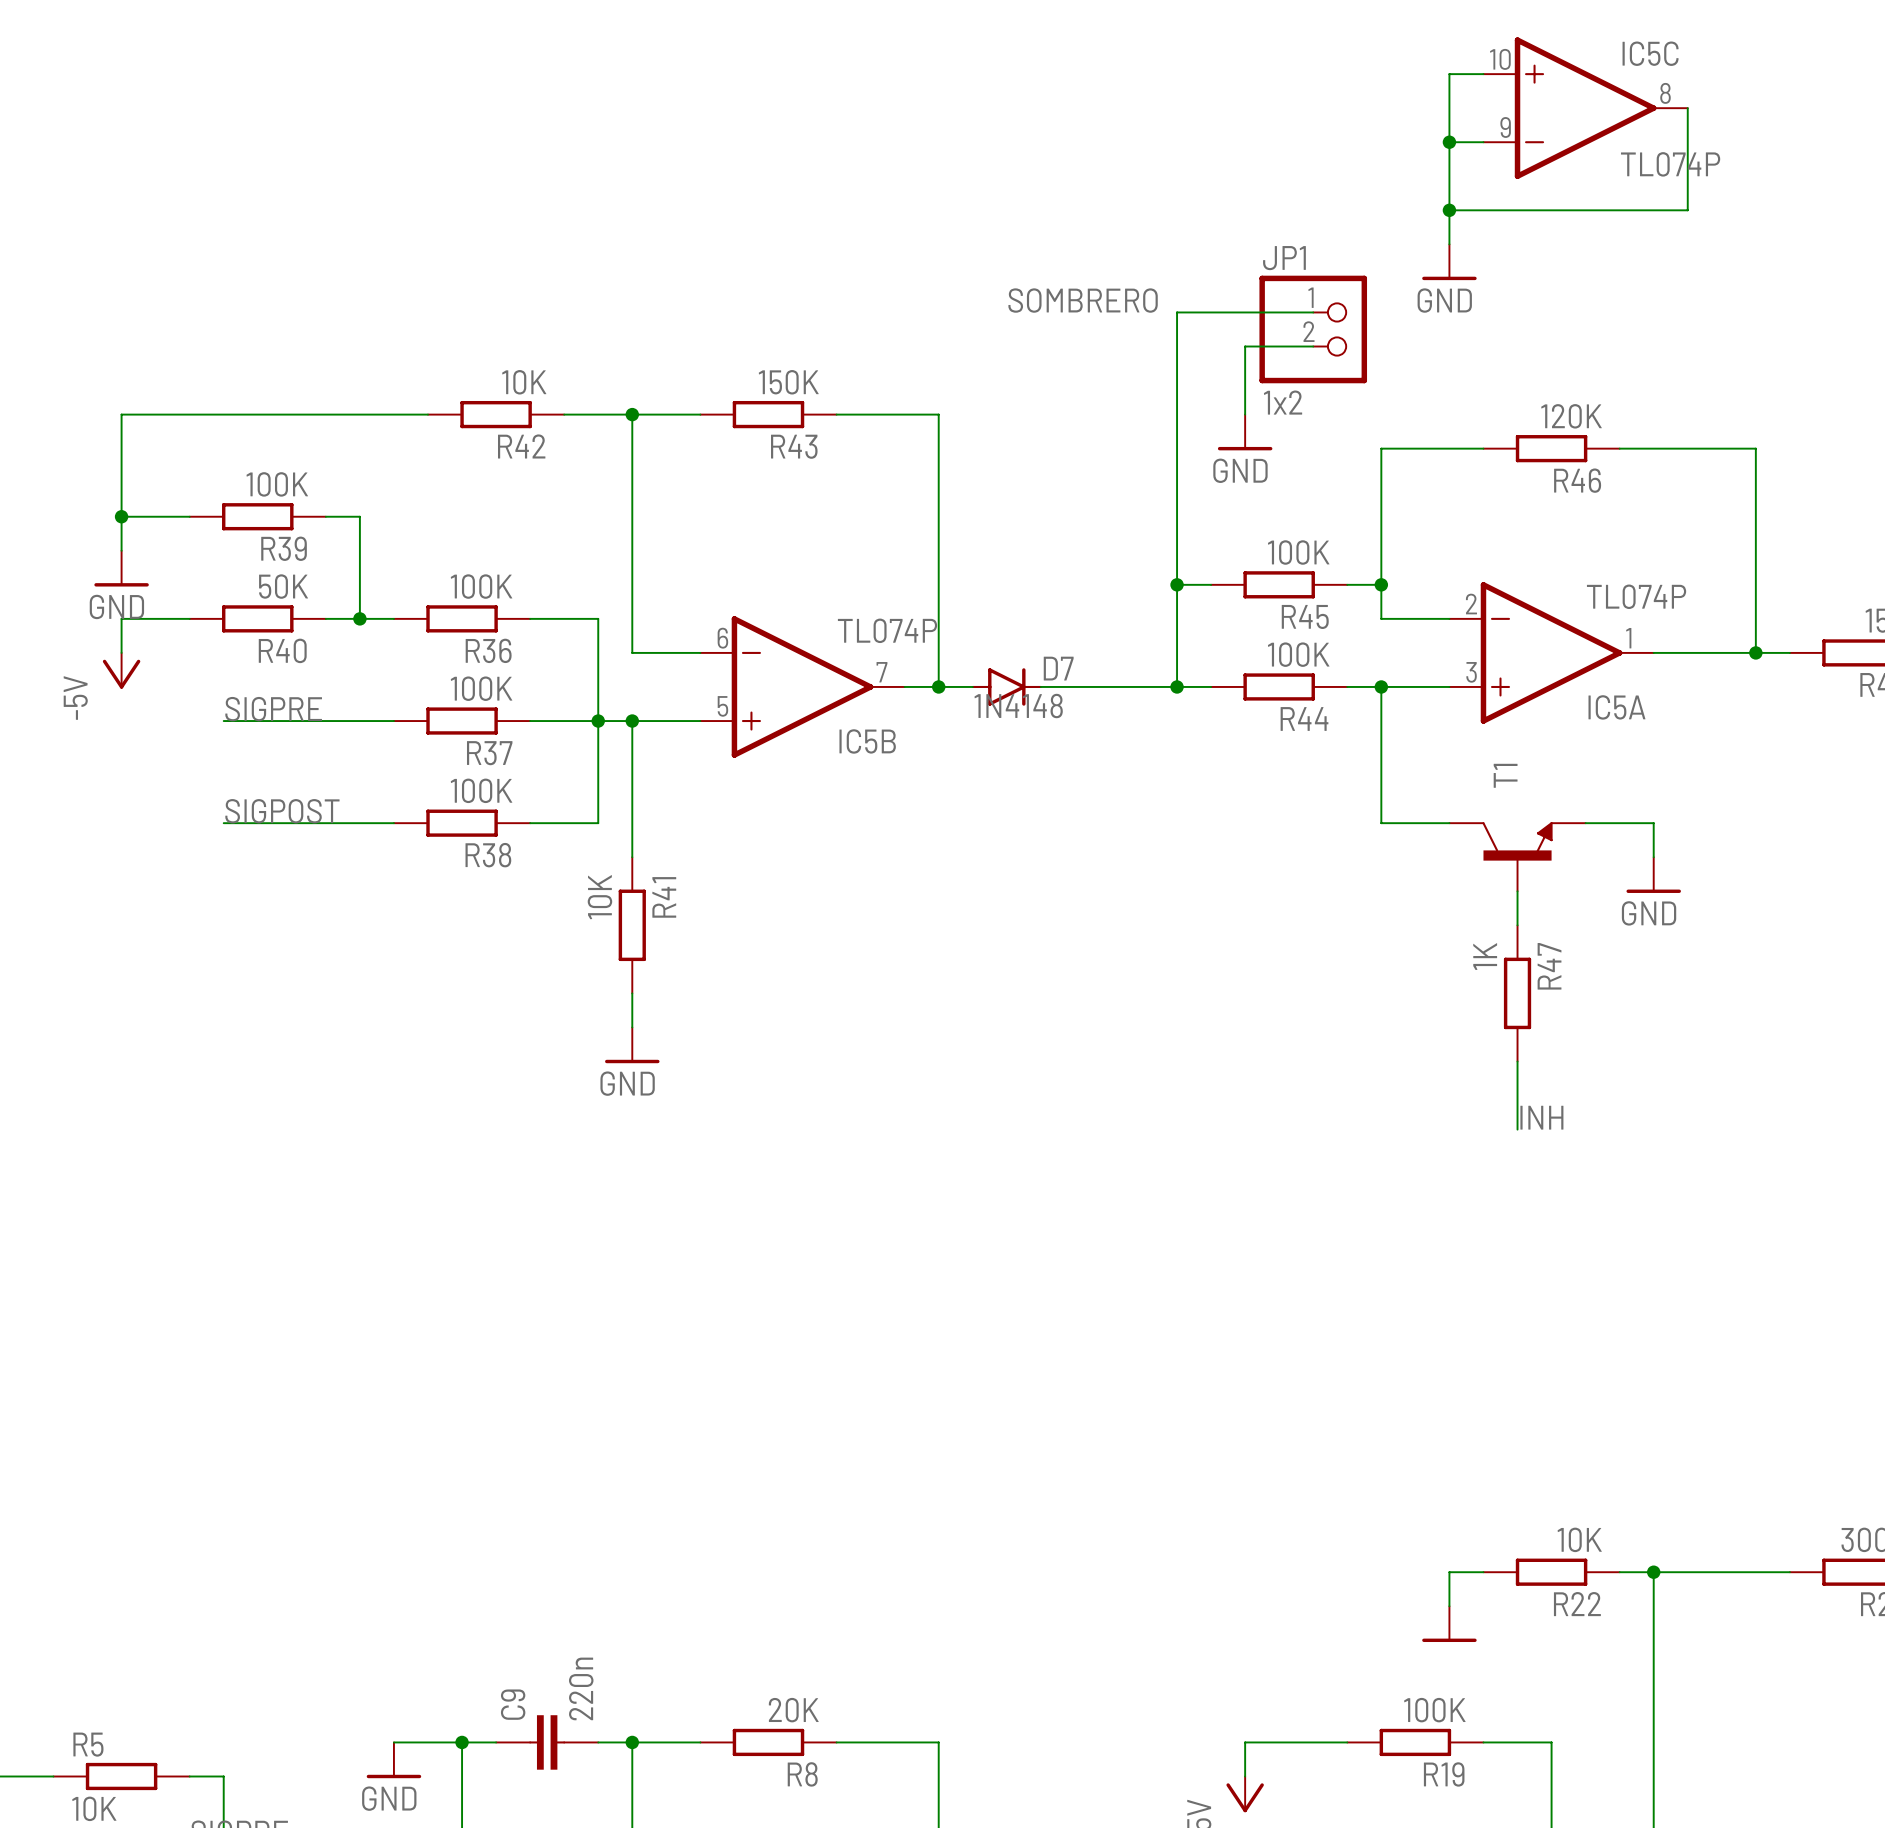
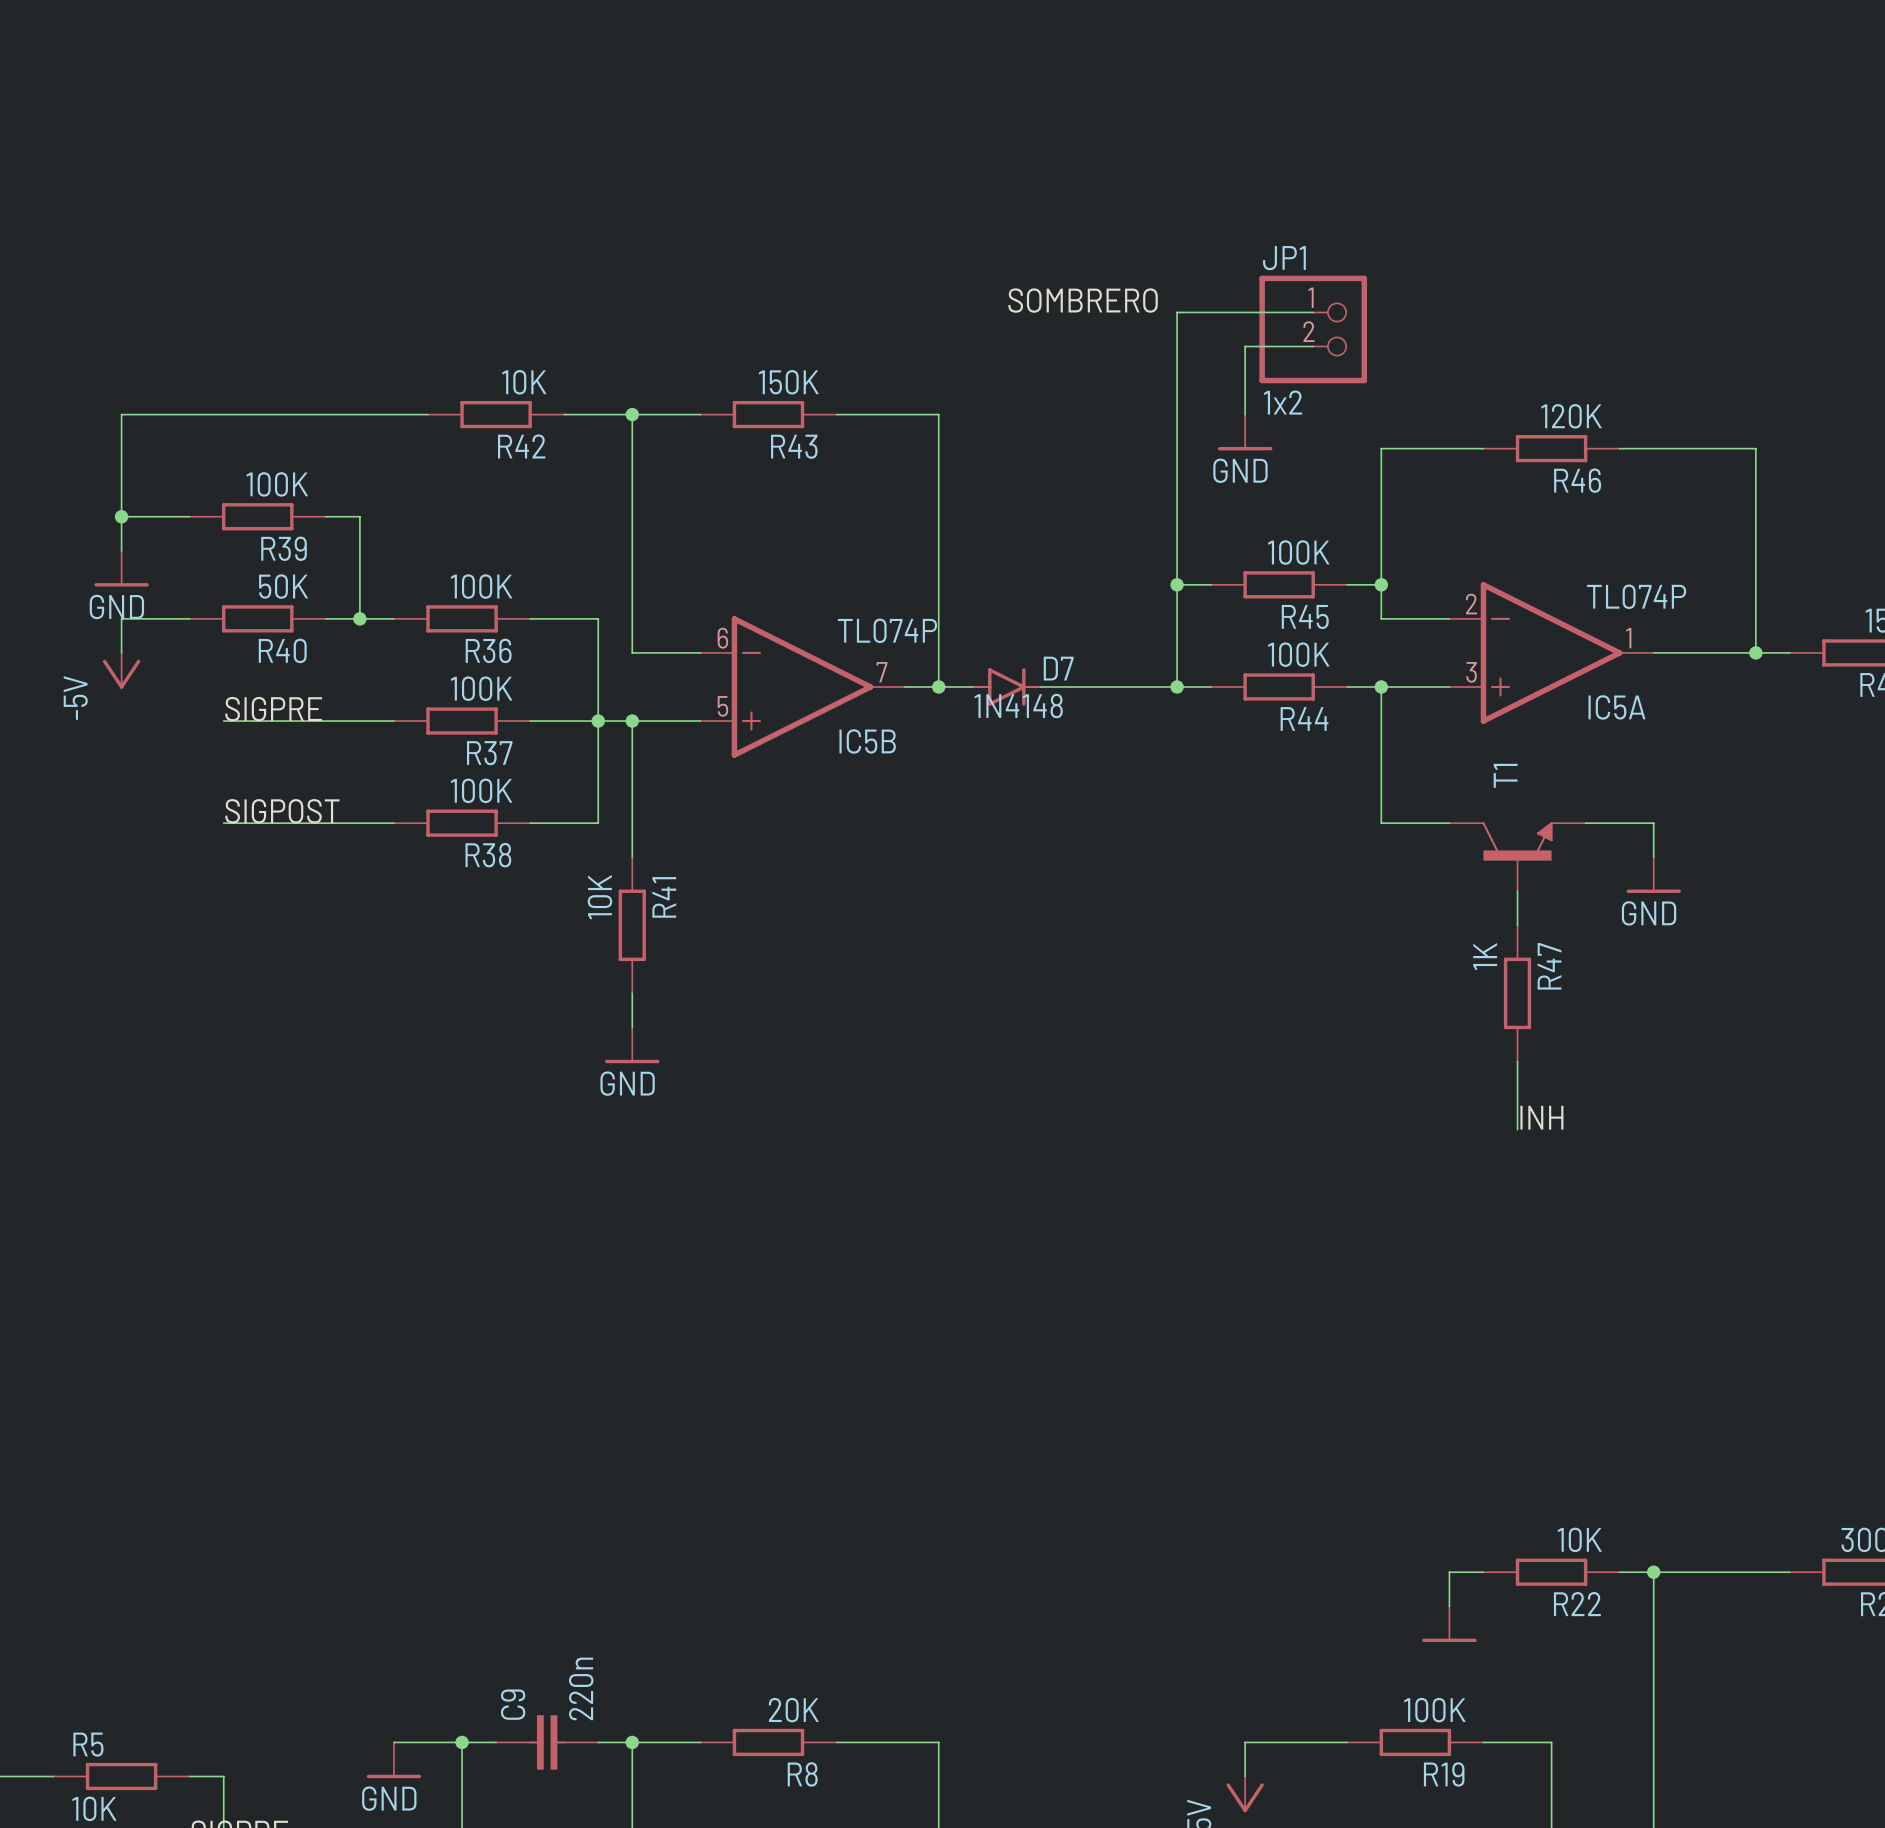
wire: (1483, 74) (1449, 74) (1449, 244) -> none
IC5C: TL074P (1585, 108) -> none
wire: (1687, 108) (1687, 210) (1449, 210) -> none
wire: (1449, 142) (1483, 142) -> none
junction: (1449, 142) -> none
junction: (1449, 210) -> none
power symbol: GND (1449, 262) -> none

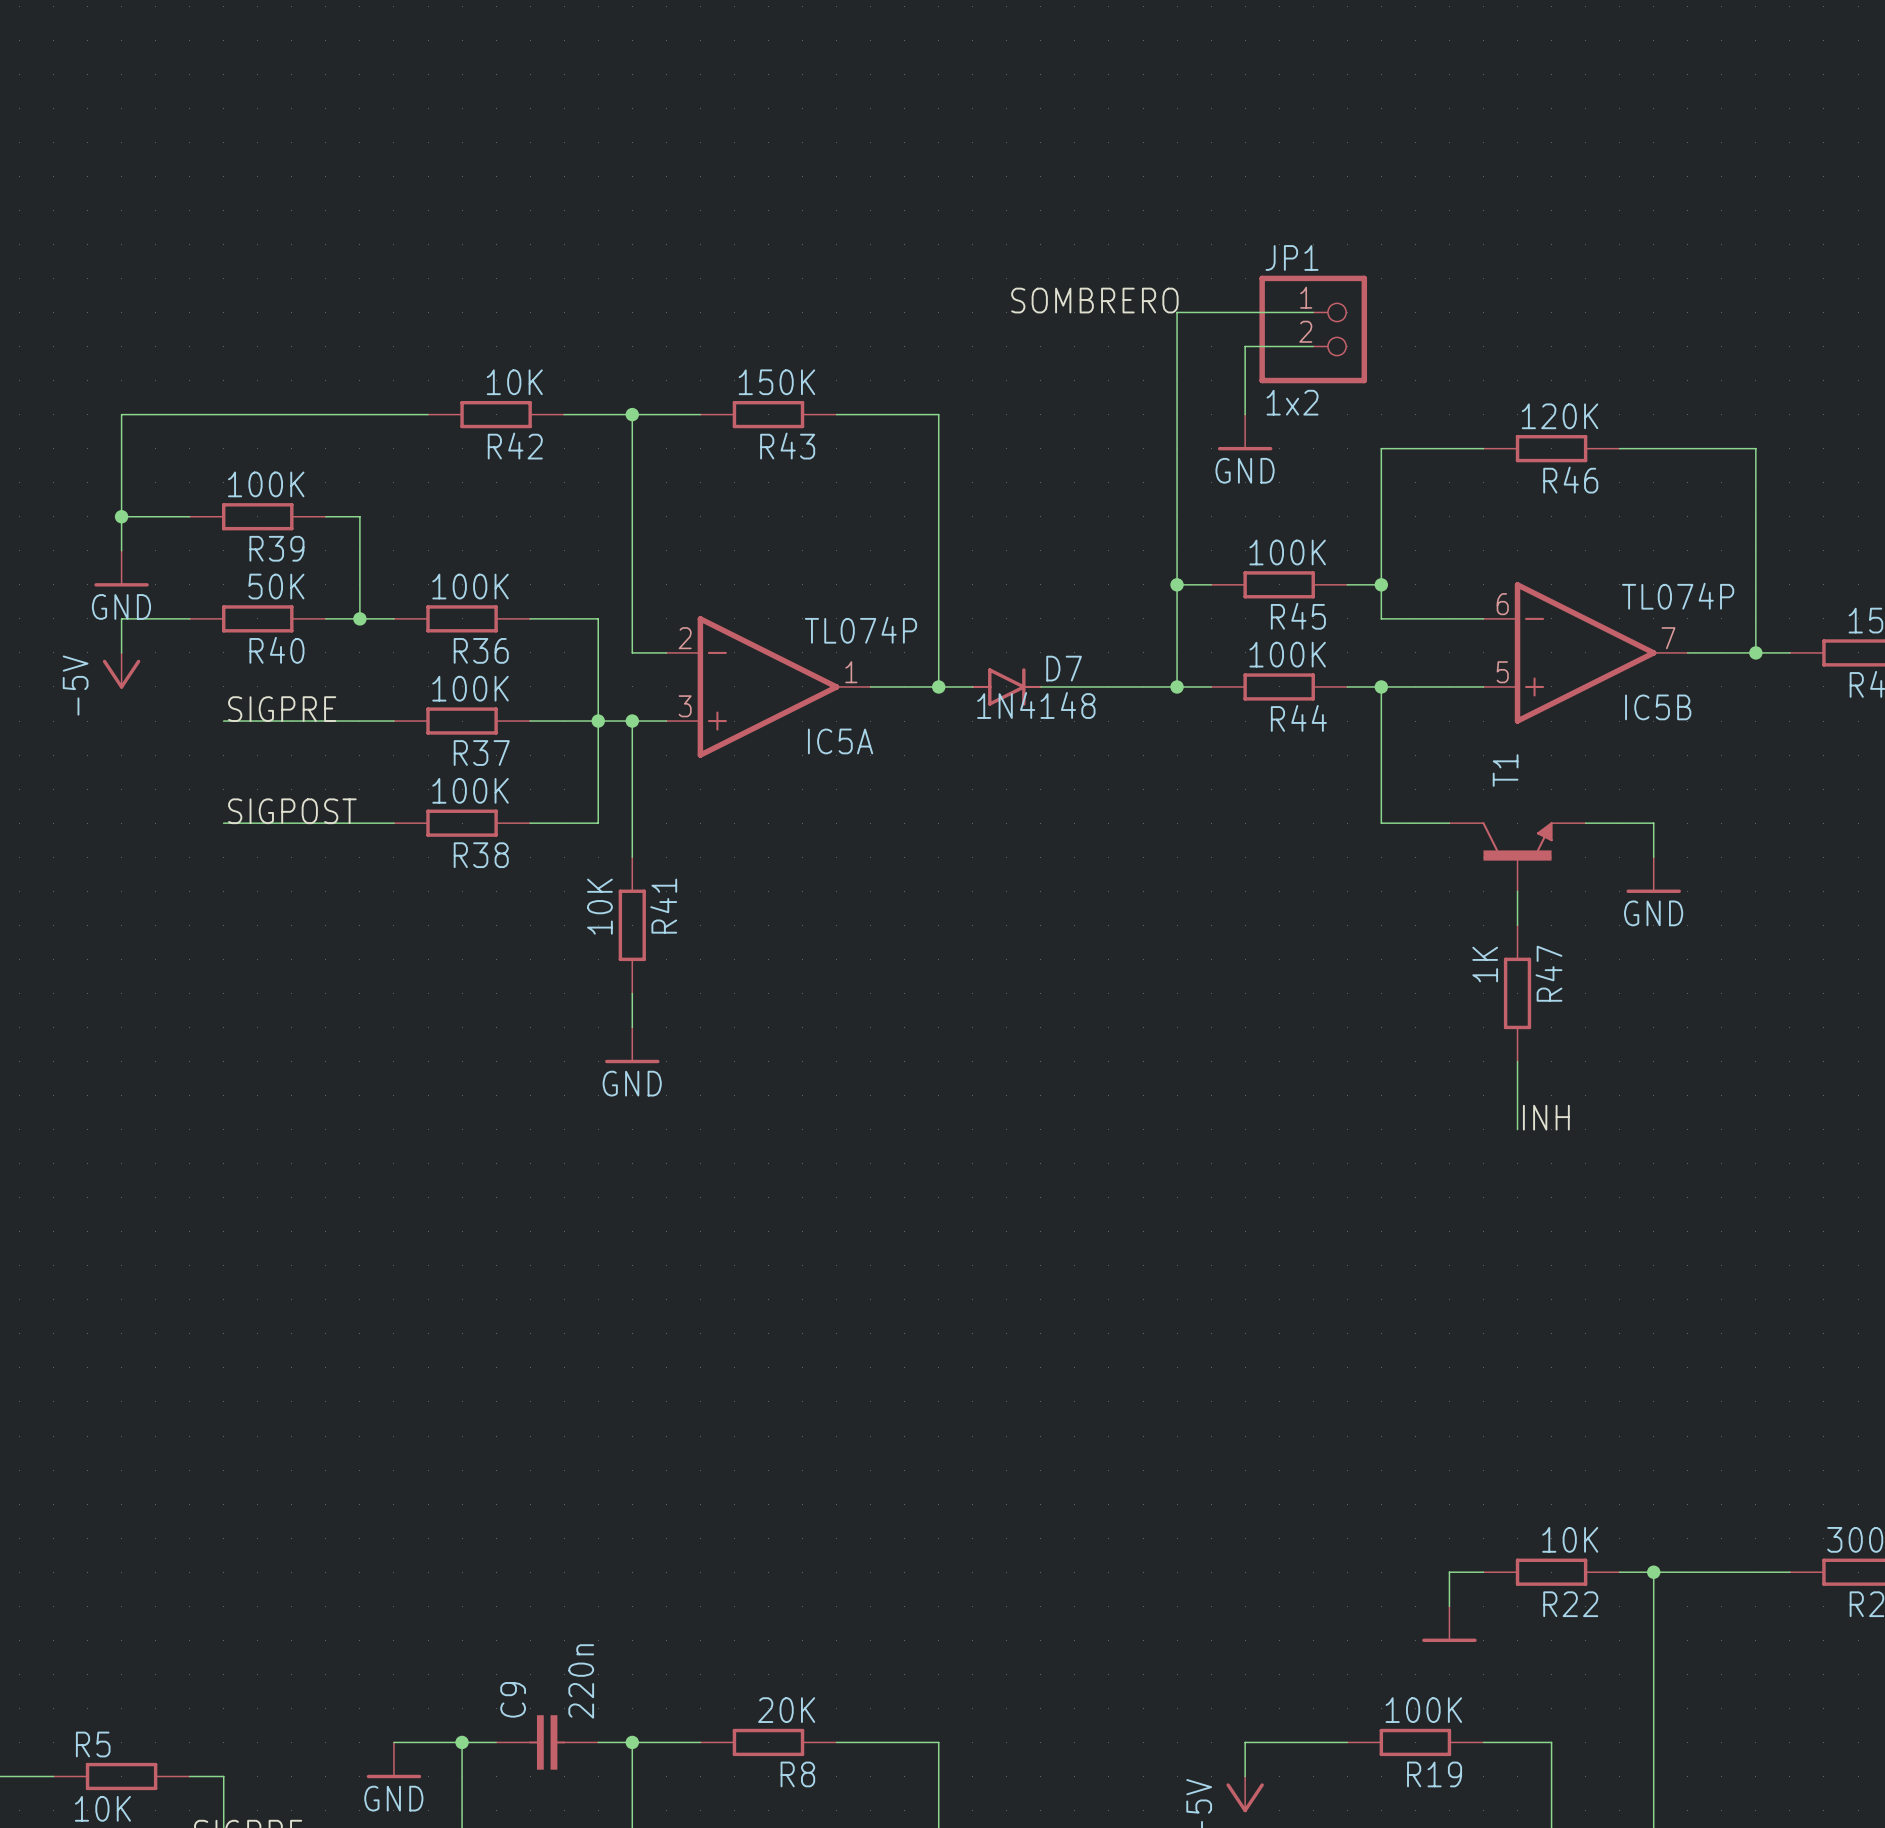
IC5A position: (1551, 652) -> (768, 686)
IC5B position: (802, 686) -> (1585, 652)

